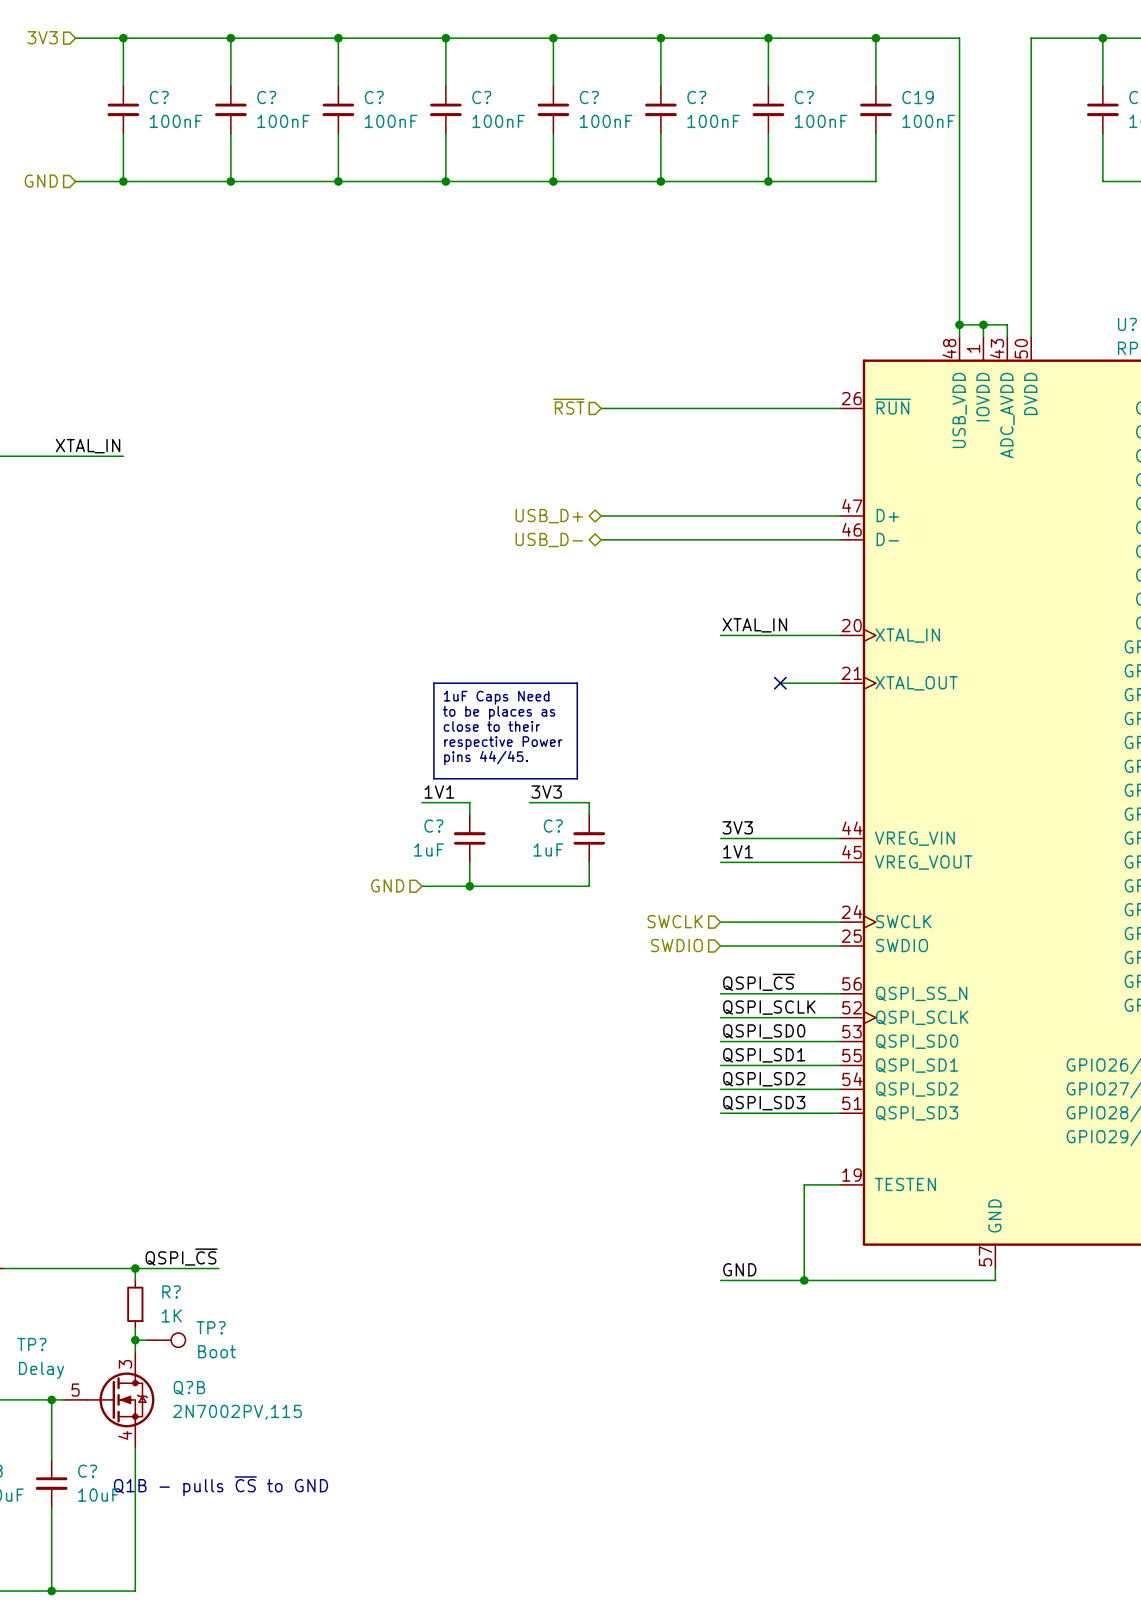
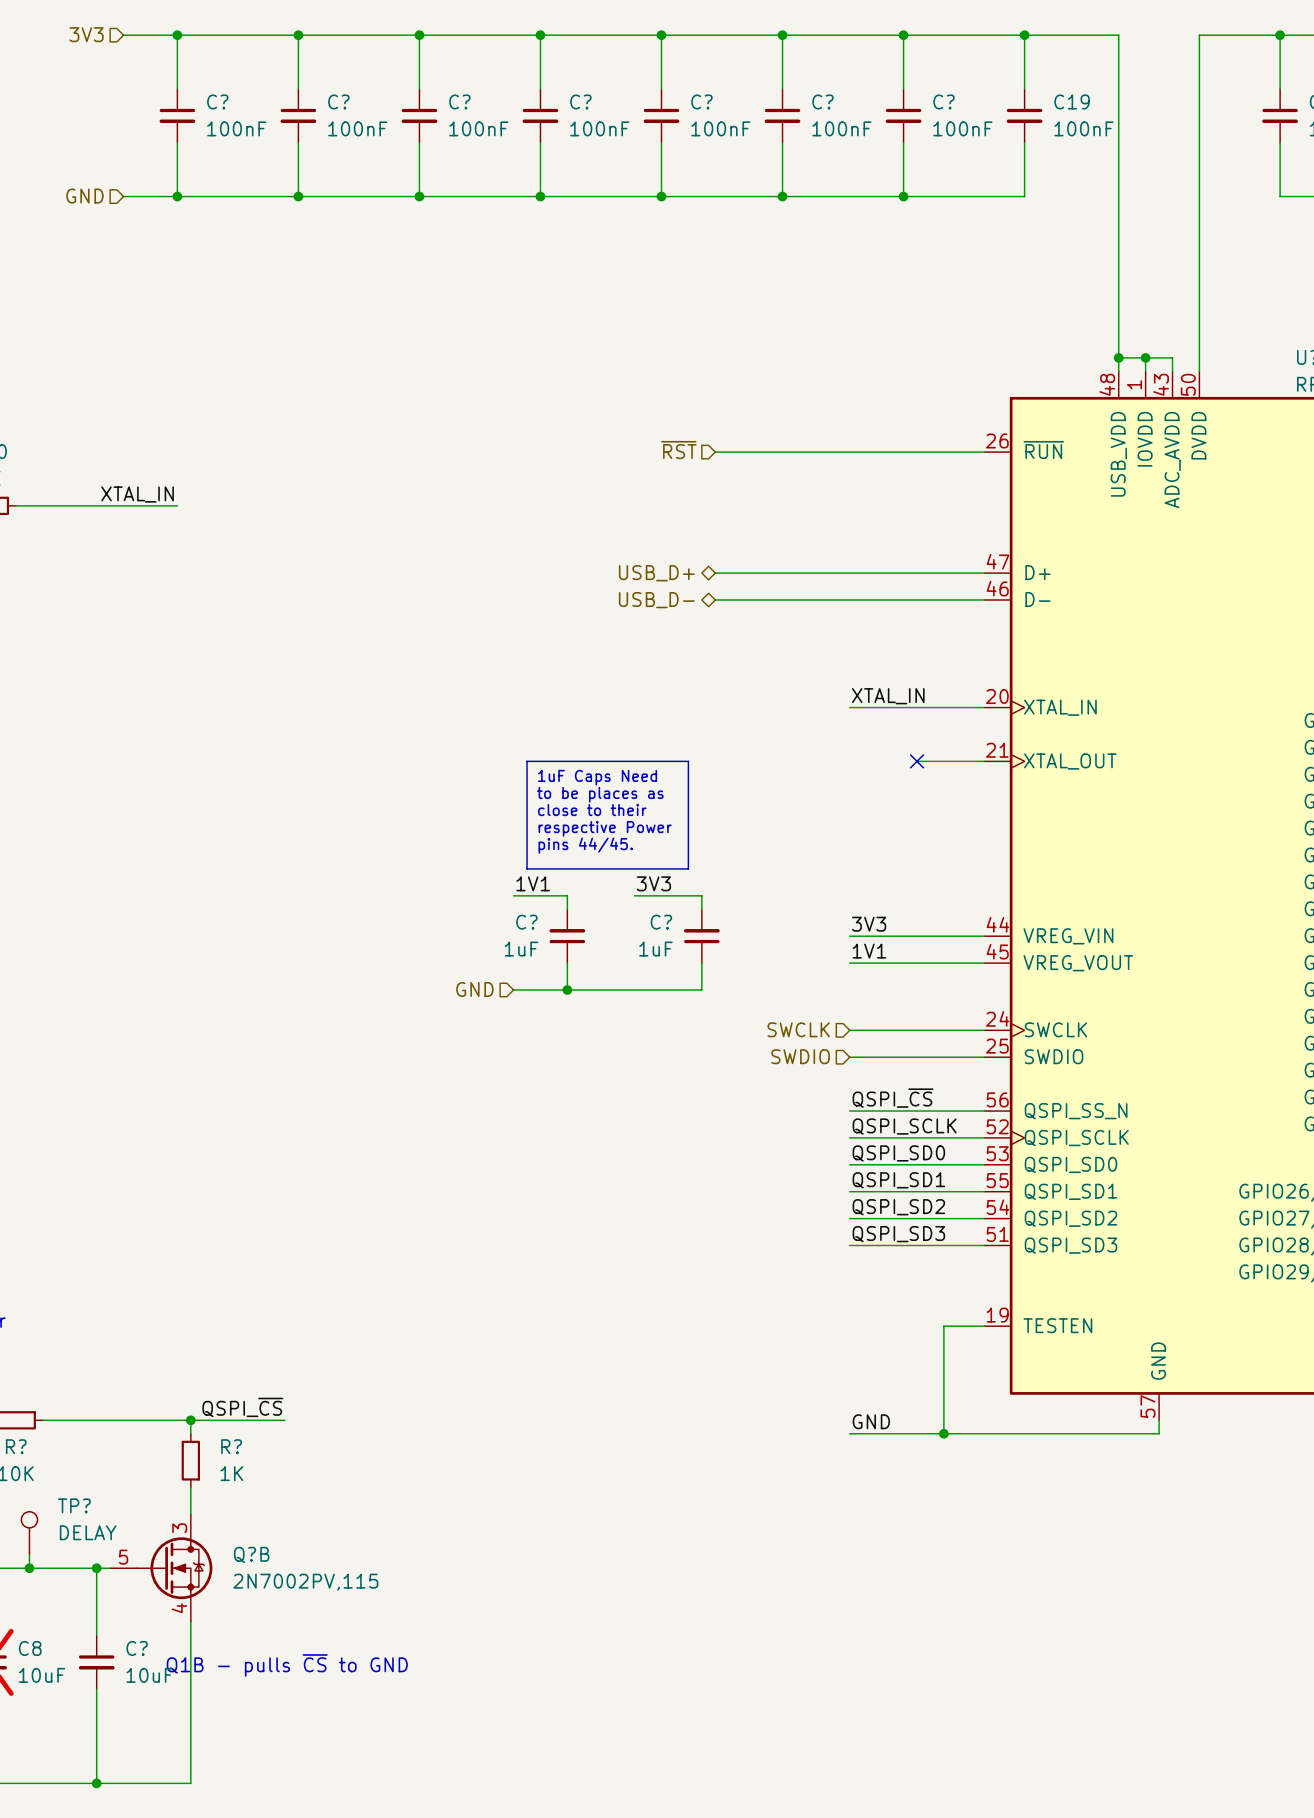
wire: (135, 1340) (147, 1340) -> none
junction: (135, 1340) -> none
TP?: Boot (166, 1340) -> none
TP? value: Delay (41, 1370) -> DELAY (88, 1532)

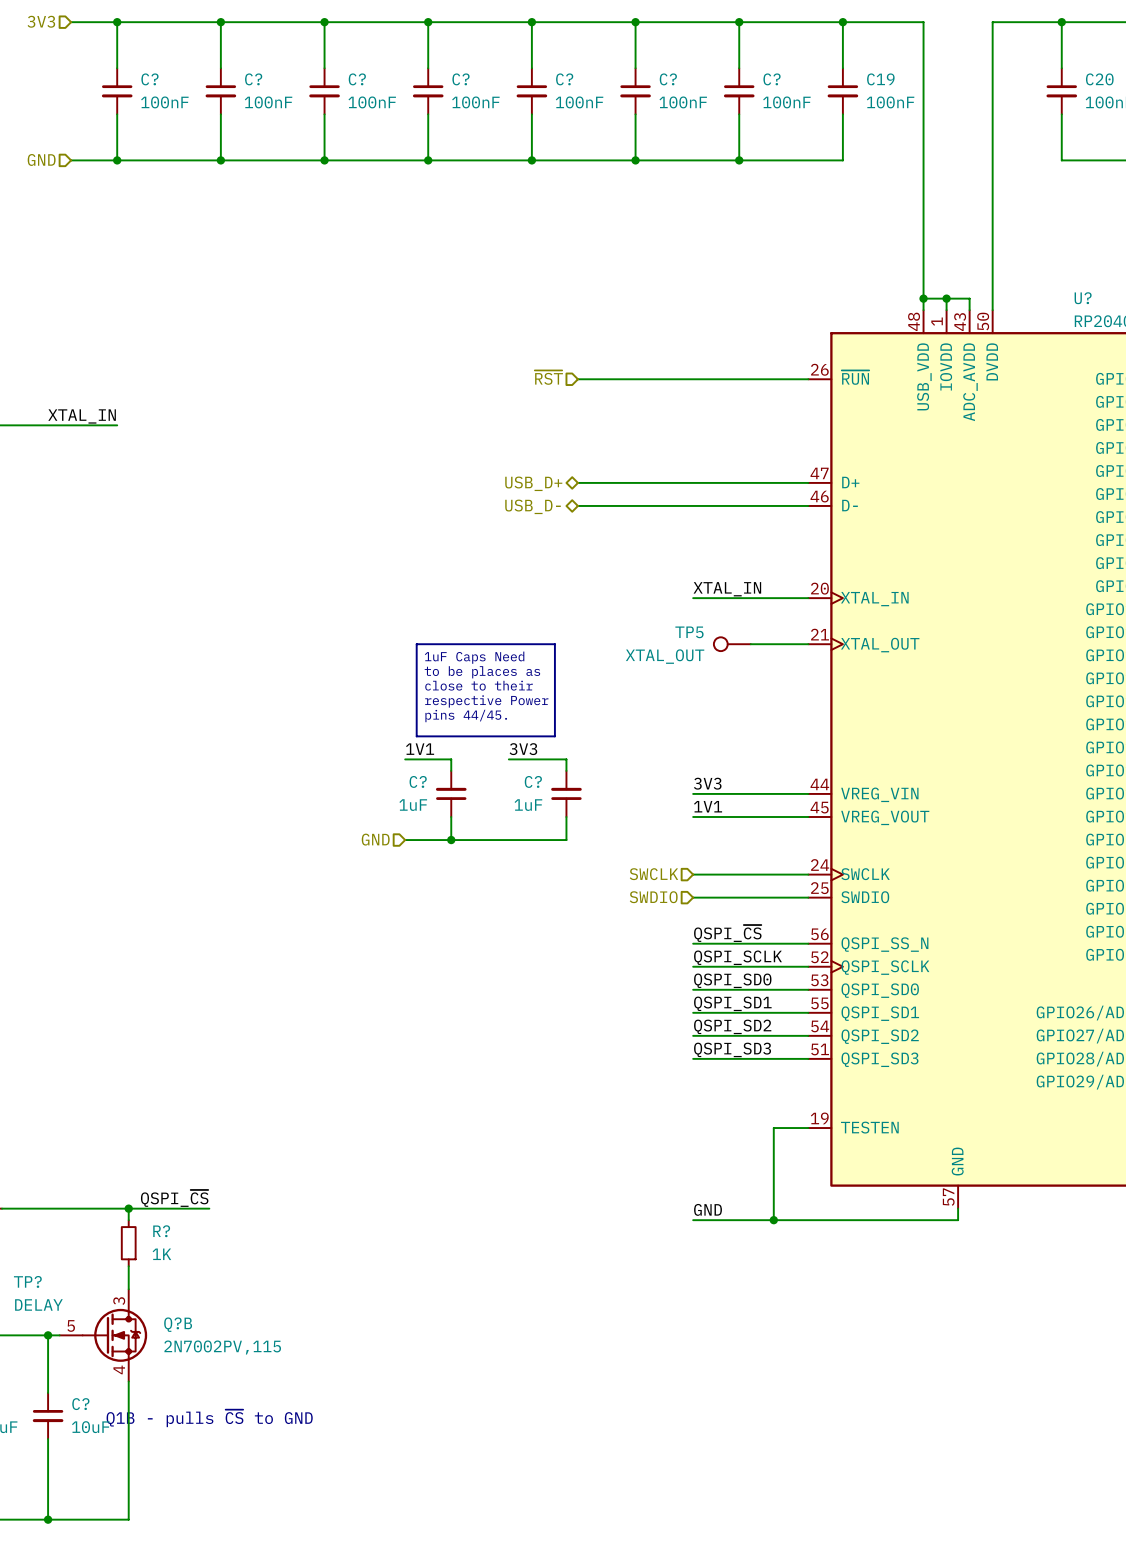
TP5: none -> XTAL_OUT (732, 644)
no-connect mark: (917, 761) -> none

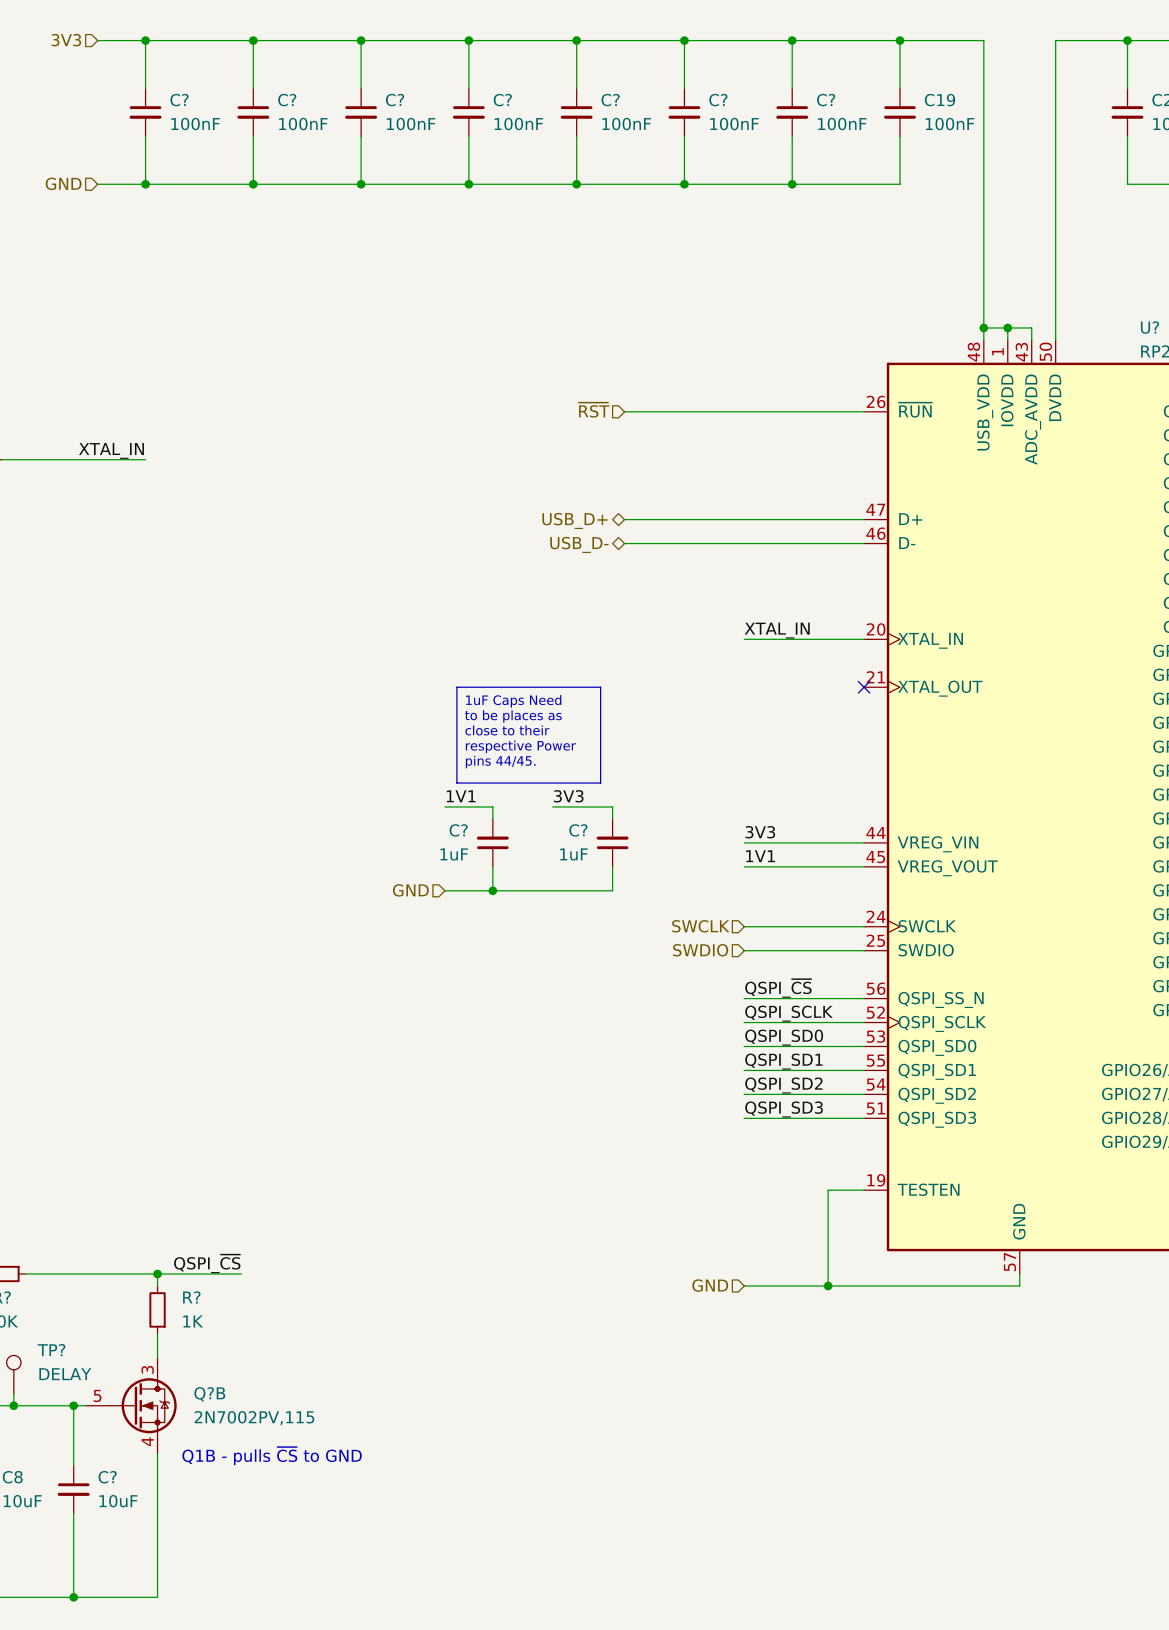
TP5: XTAL_OUT (732, 644) -> none
wire: (750, 644) (808, 644) -> none
no-connect mark: none -> (864, 687)
label: GND (708, 1209) -> none
hierarchical label: none -> GND (710, 1285)
text position: Q1B - pulls ~{CS} to GND (209, 1418) -> Q1B - pulls ~{CS} to GND (272, 1456)

